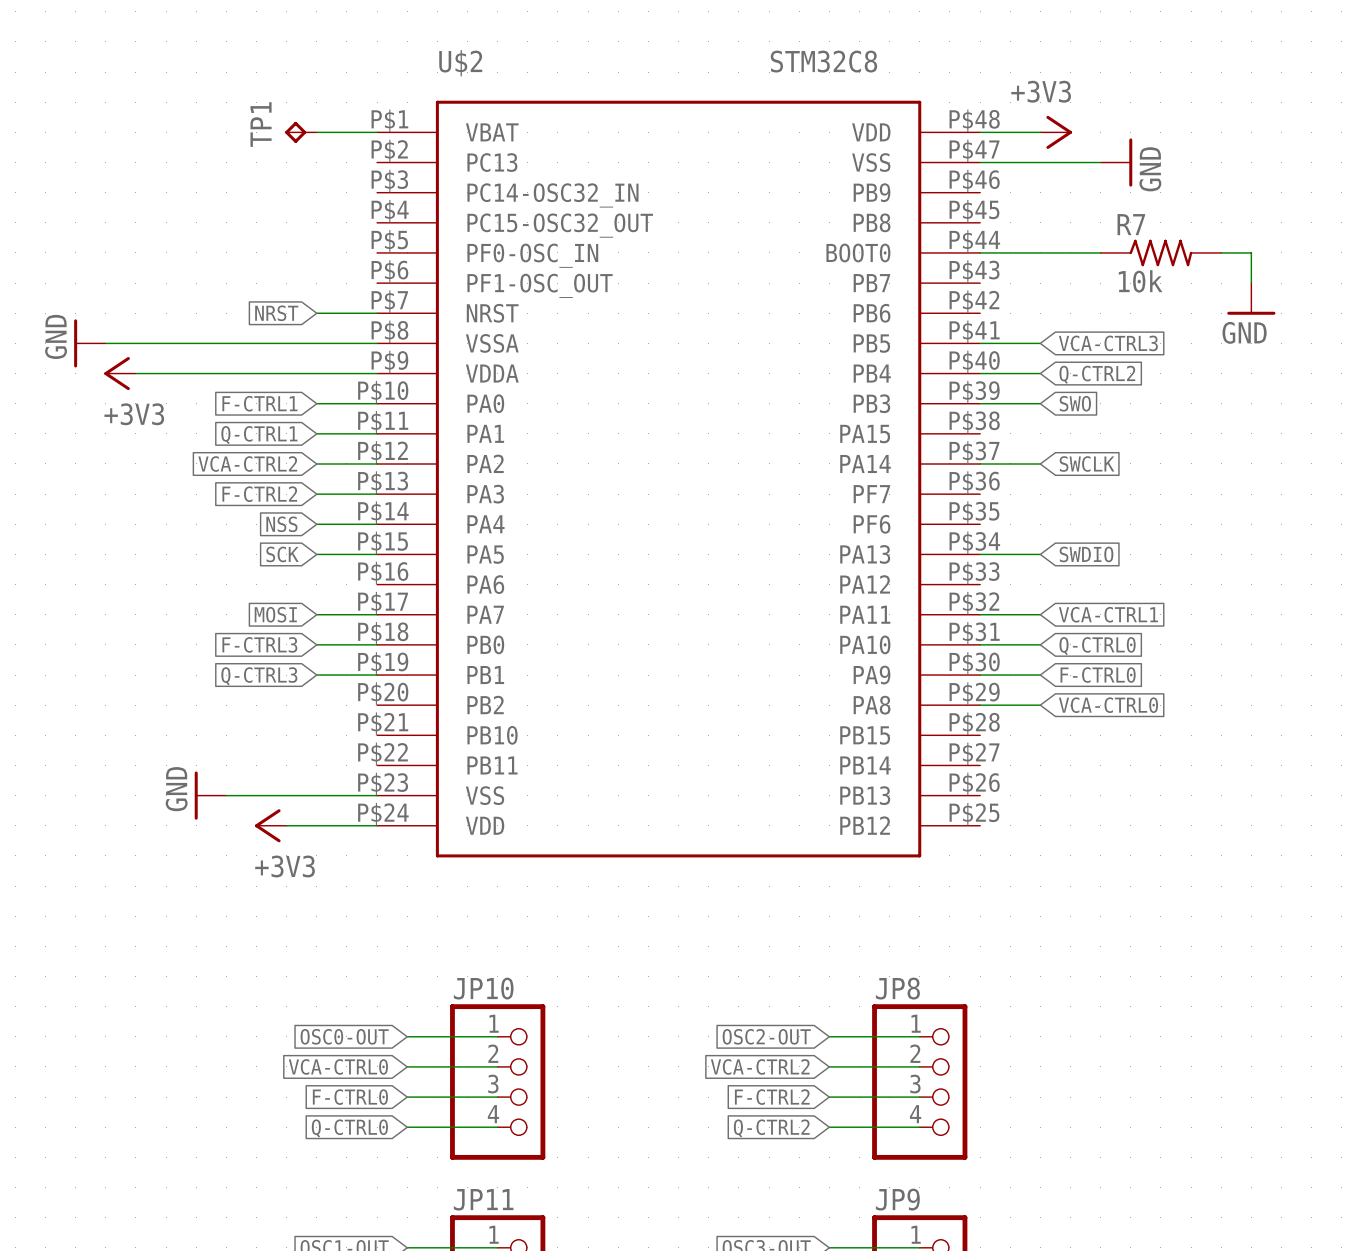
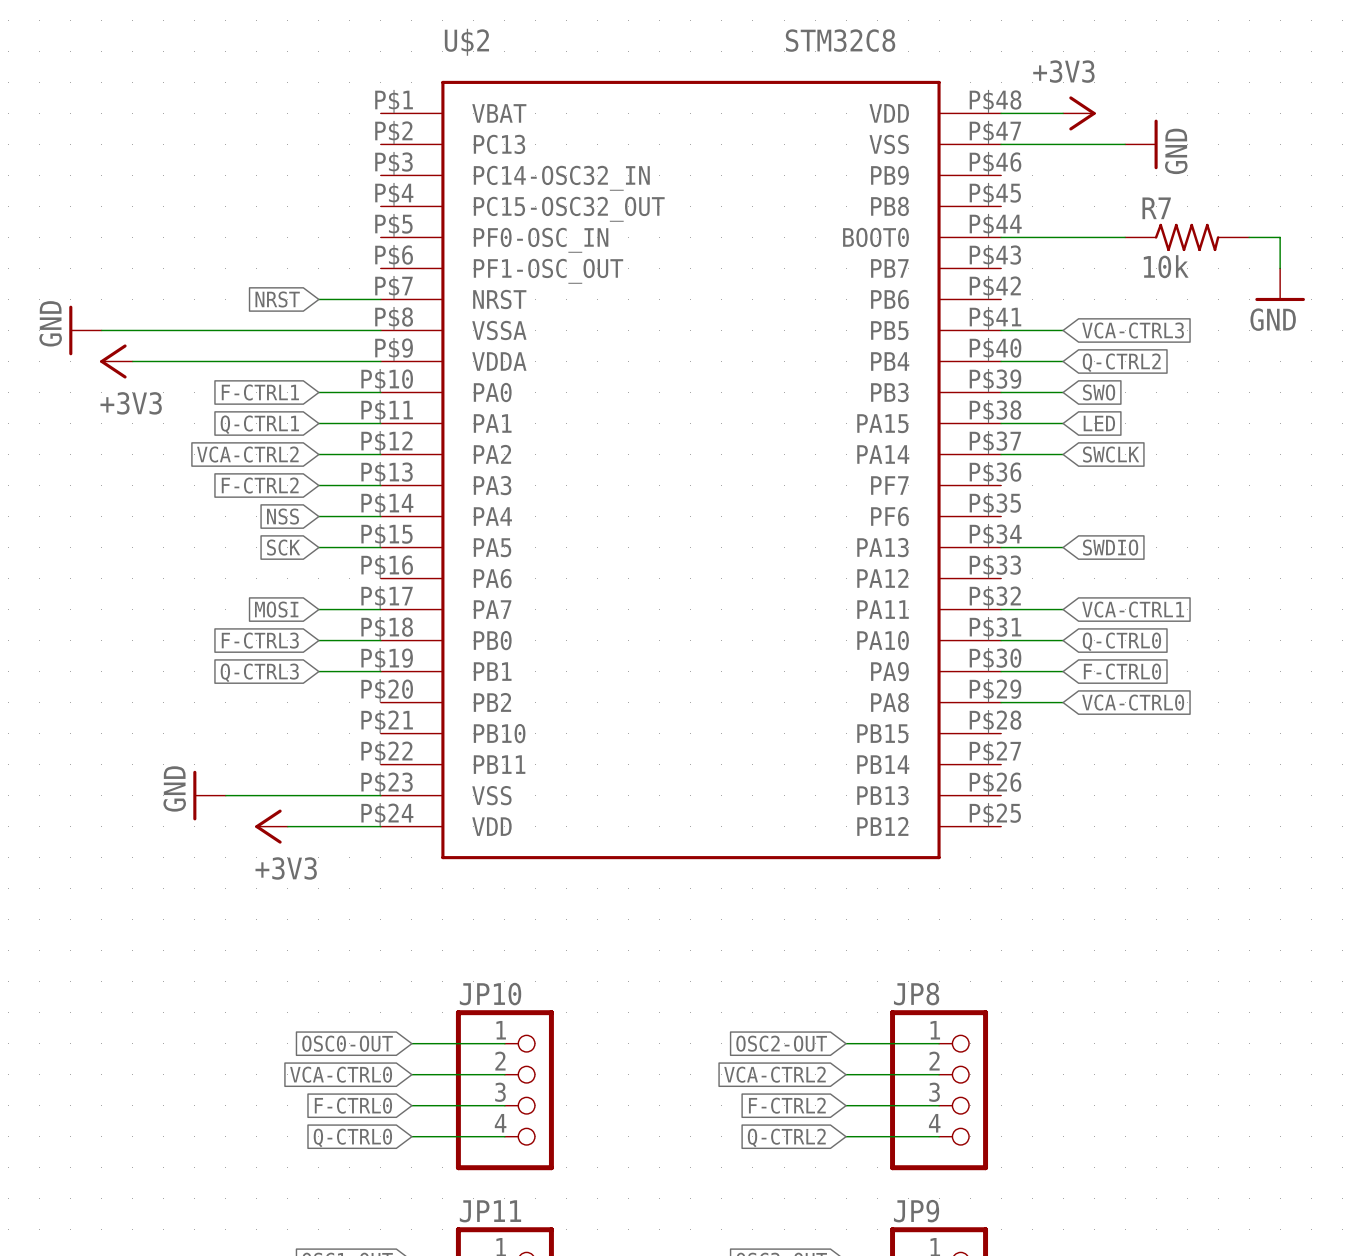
TP1: (300, 132) -> none
wire: (316, 132) (377, 132) -> none
wire: none -> (1001, 423) (1063, 423)
global label: none -> LED (1099, 423)

